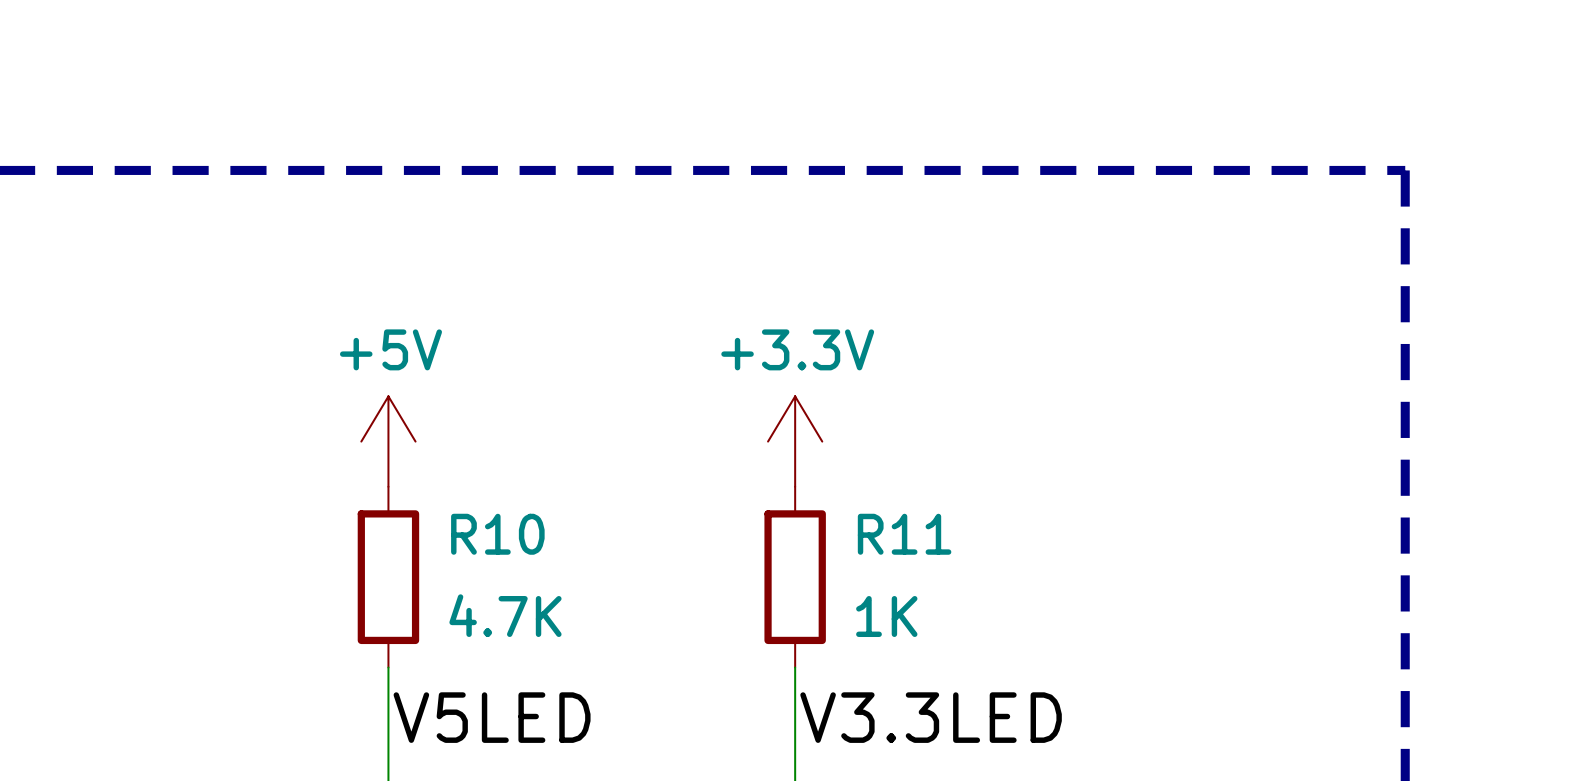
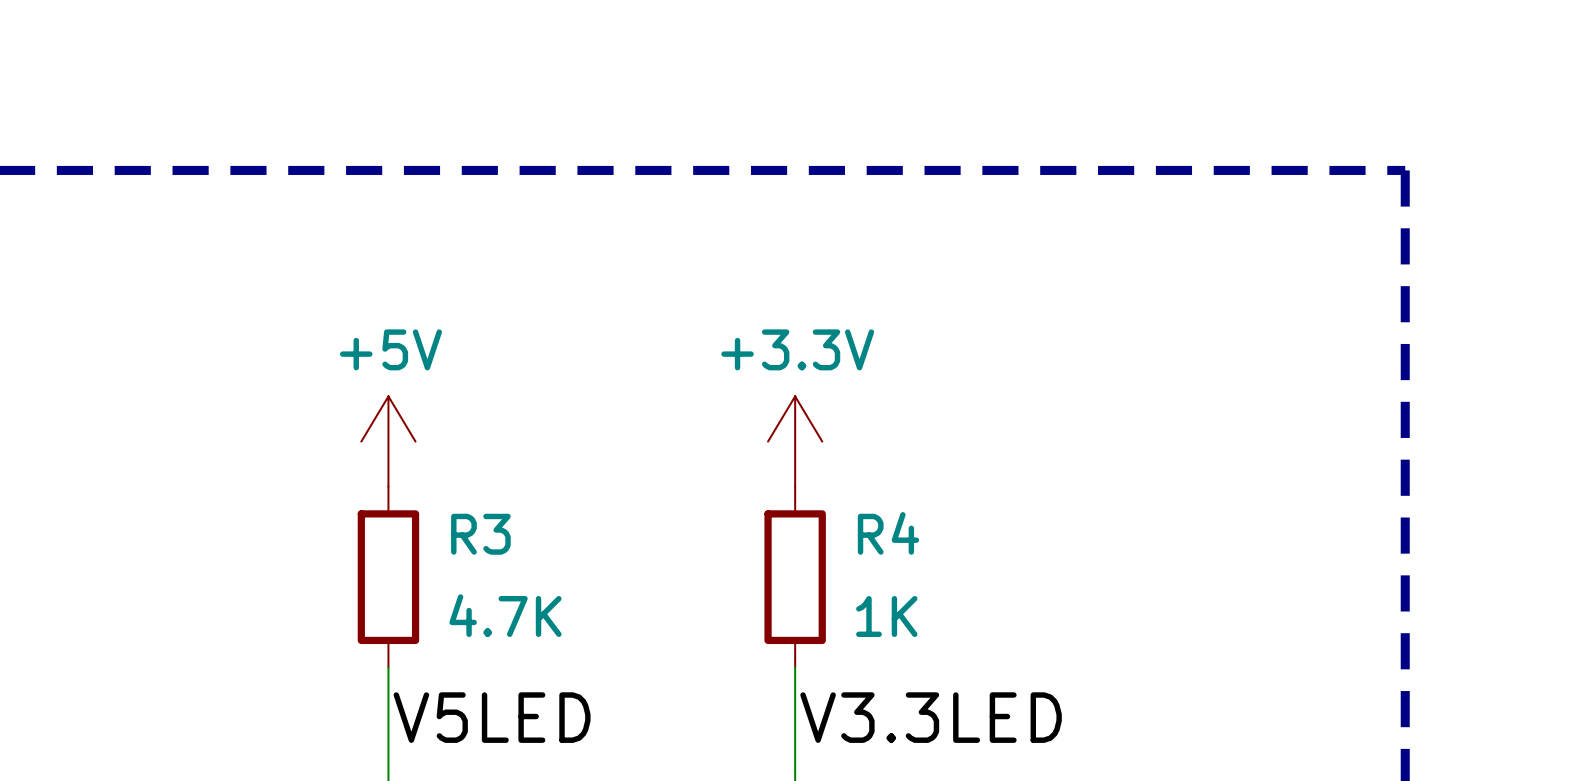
R10 name: R10 (497, 534) -> R3 (480, 534)
R11 name: R11 (904, 534) -> R4 (888, 533)

